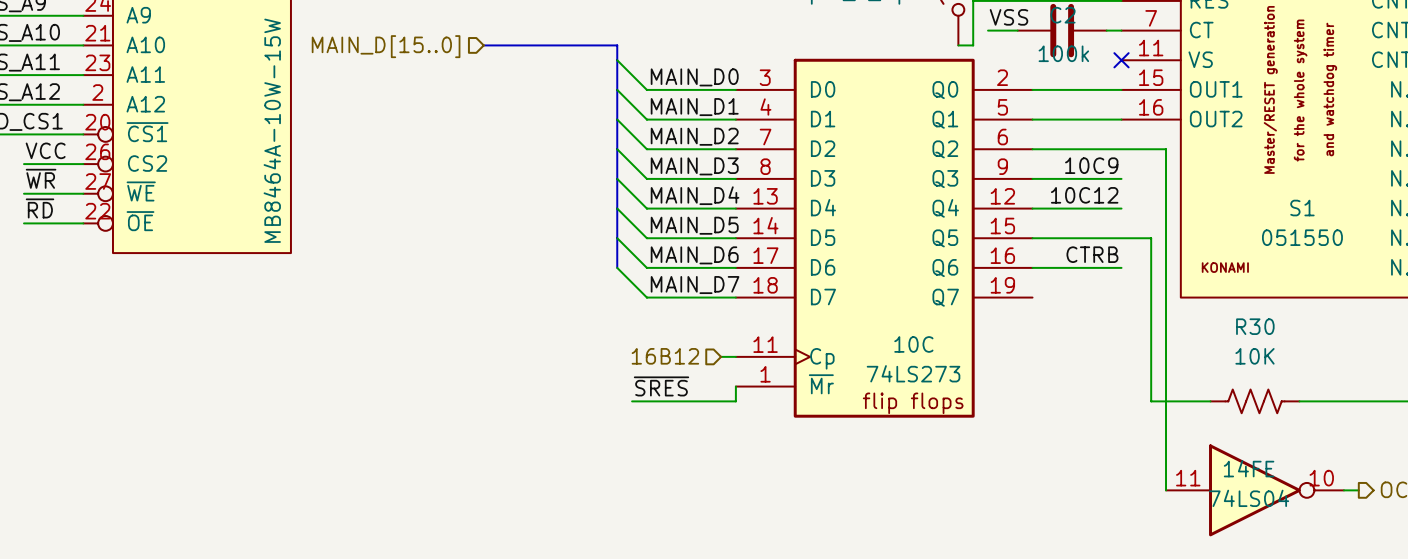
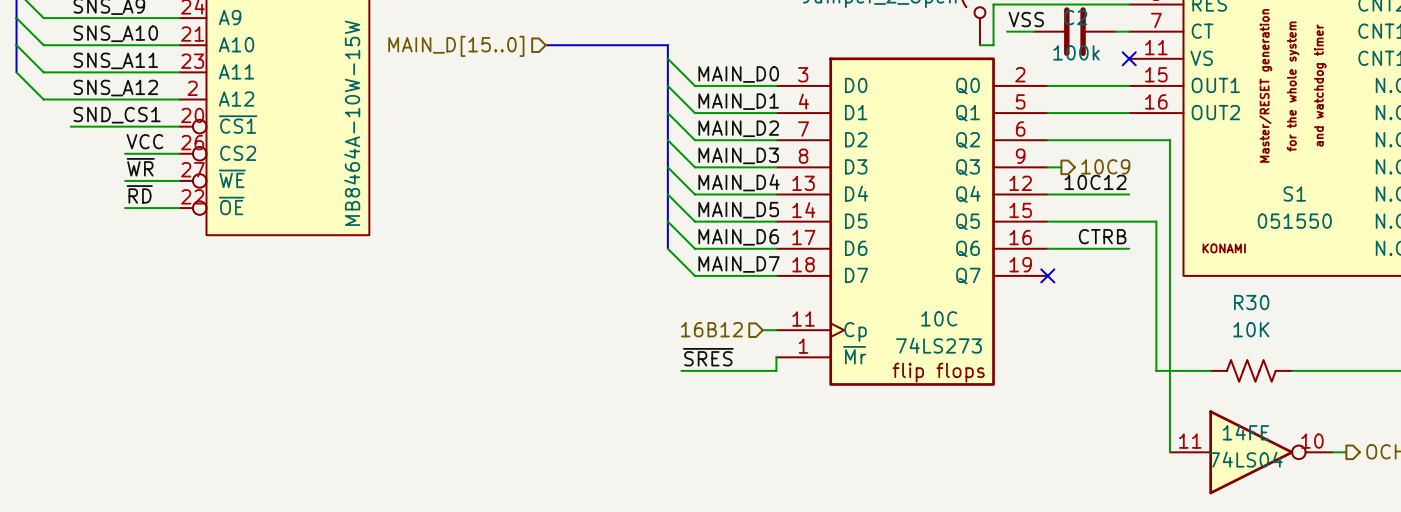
label: 10C9 (1091, 165) -> none
wire: (1047, 178) (1121, 178) -> none
hierarchical label: none -> 10C9 (1105, 166)
no-connect mark: none -> (1047, 275)

